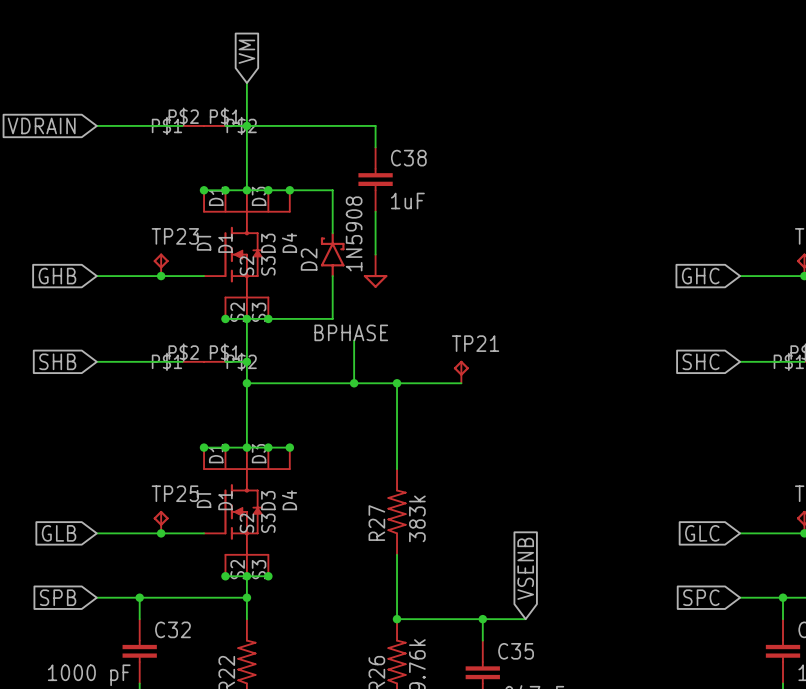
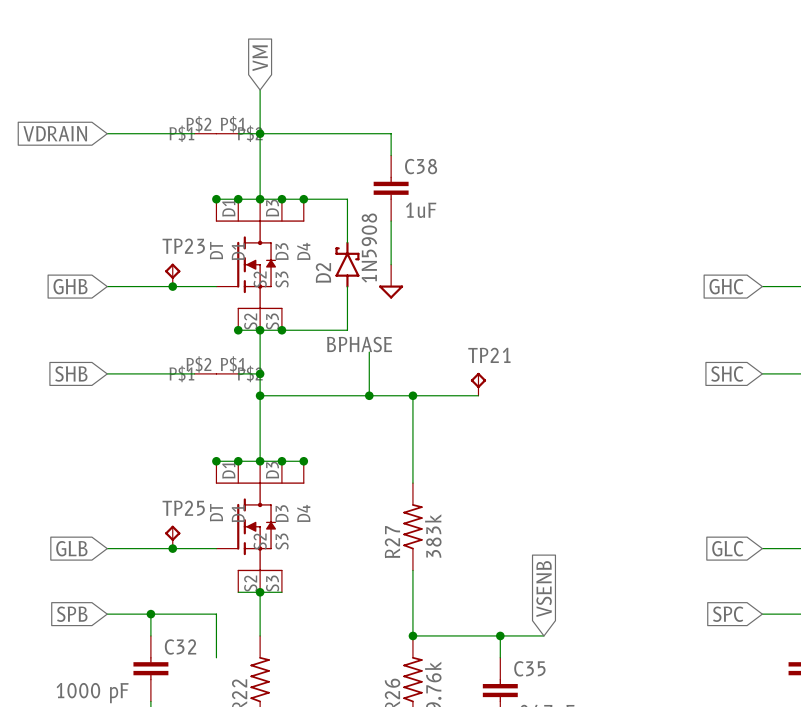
junction: (225, 576) -> none
junction: (268, 576) -> none
wire: (204, 597) (246, 597) -> (216, 614) (216, 657)
junction: (246, 597) -> none

